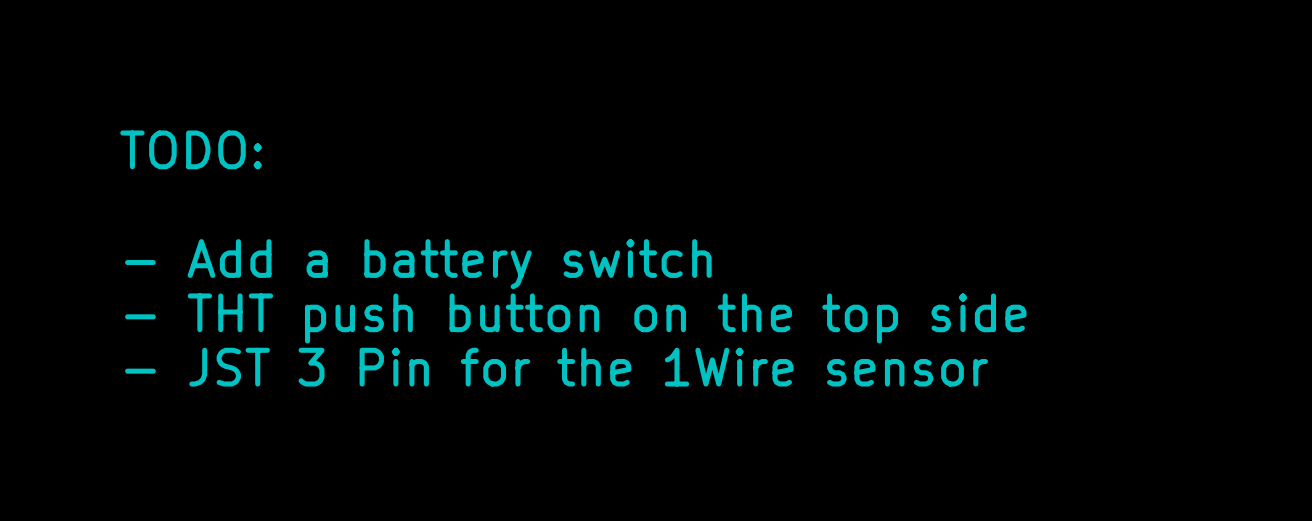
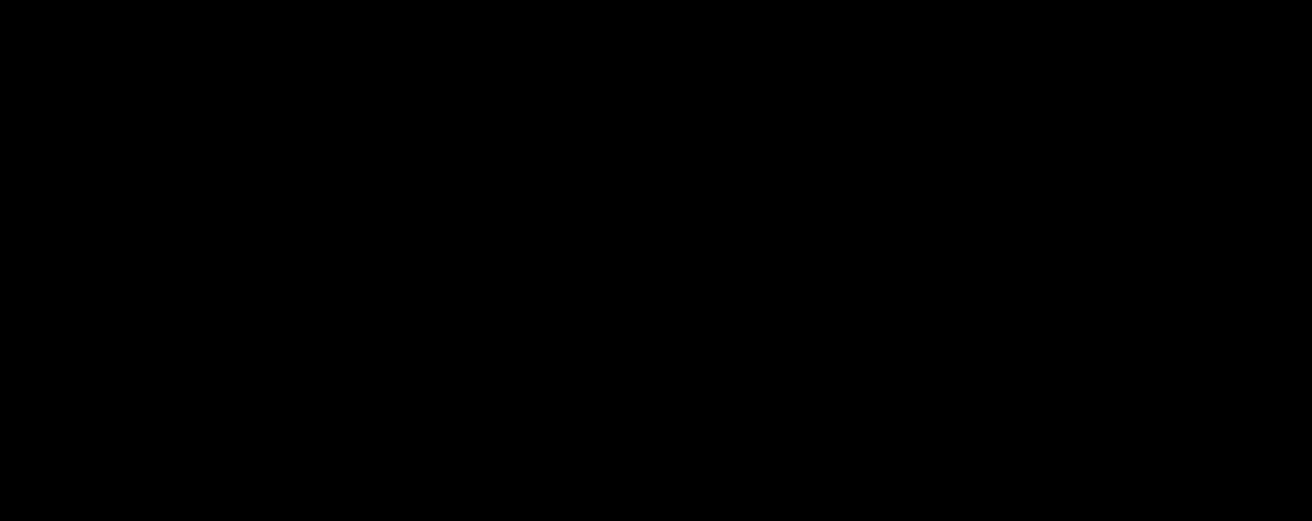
text: TODO: (191, 149) -> none
text: - Add a battery switch (418, 264) -> none
text: - THT push button on the top side (575, 318) -> none
text: - JST 3 Pin for the 1Wire sensor (556, 367) -> none

